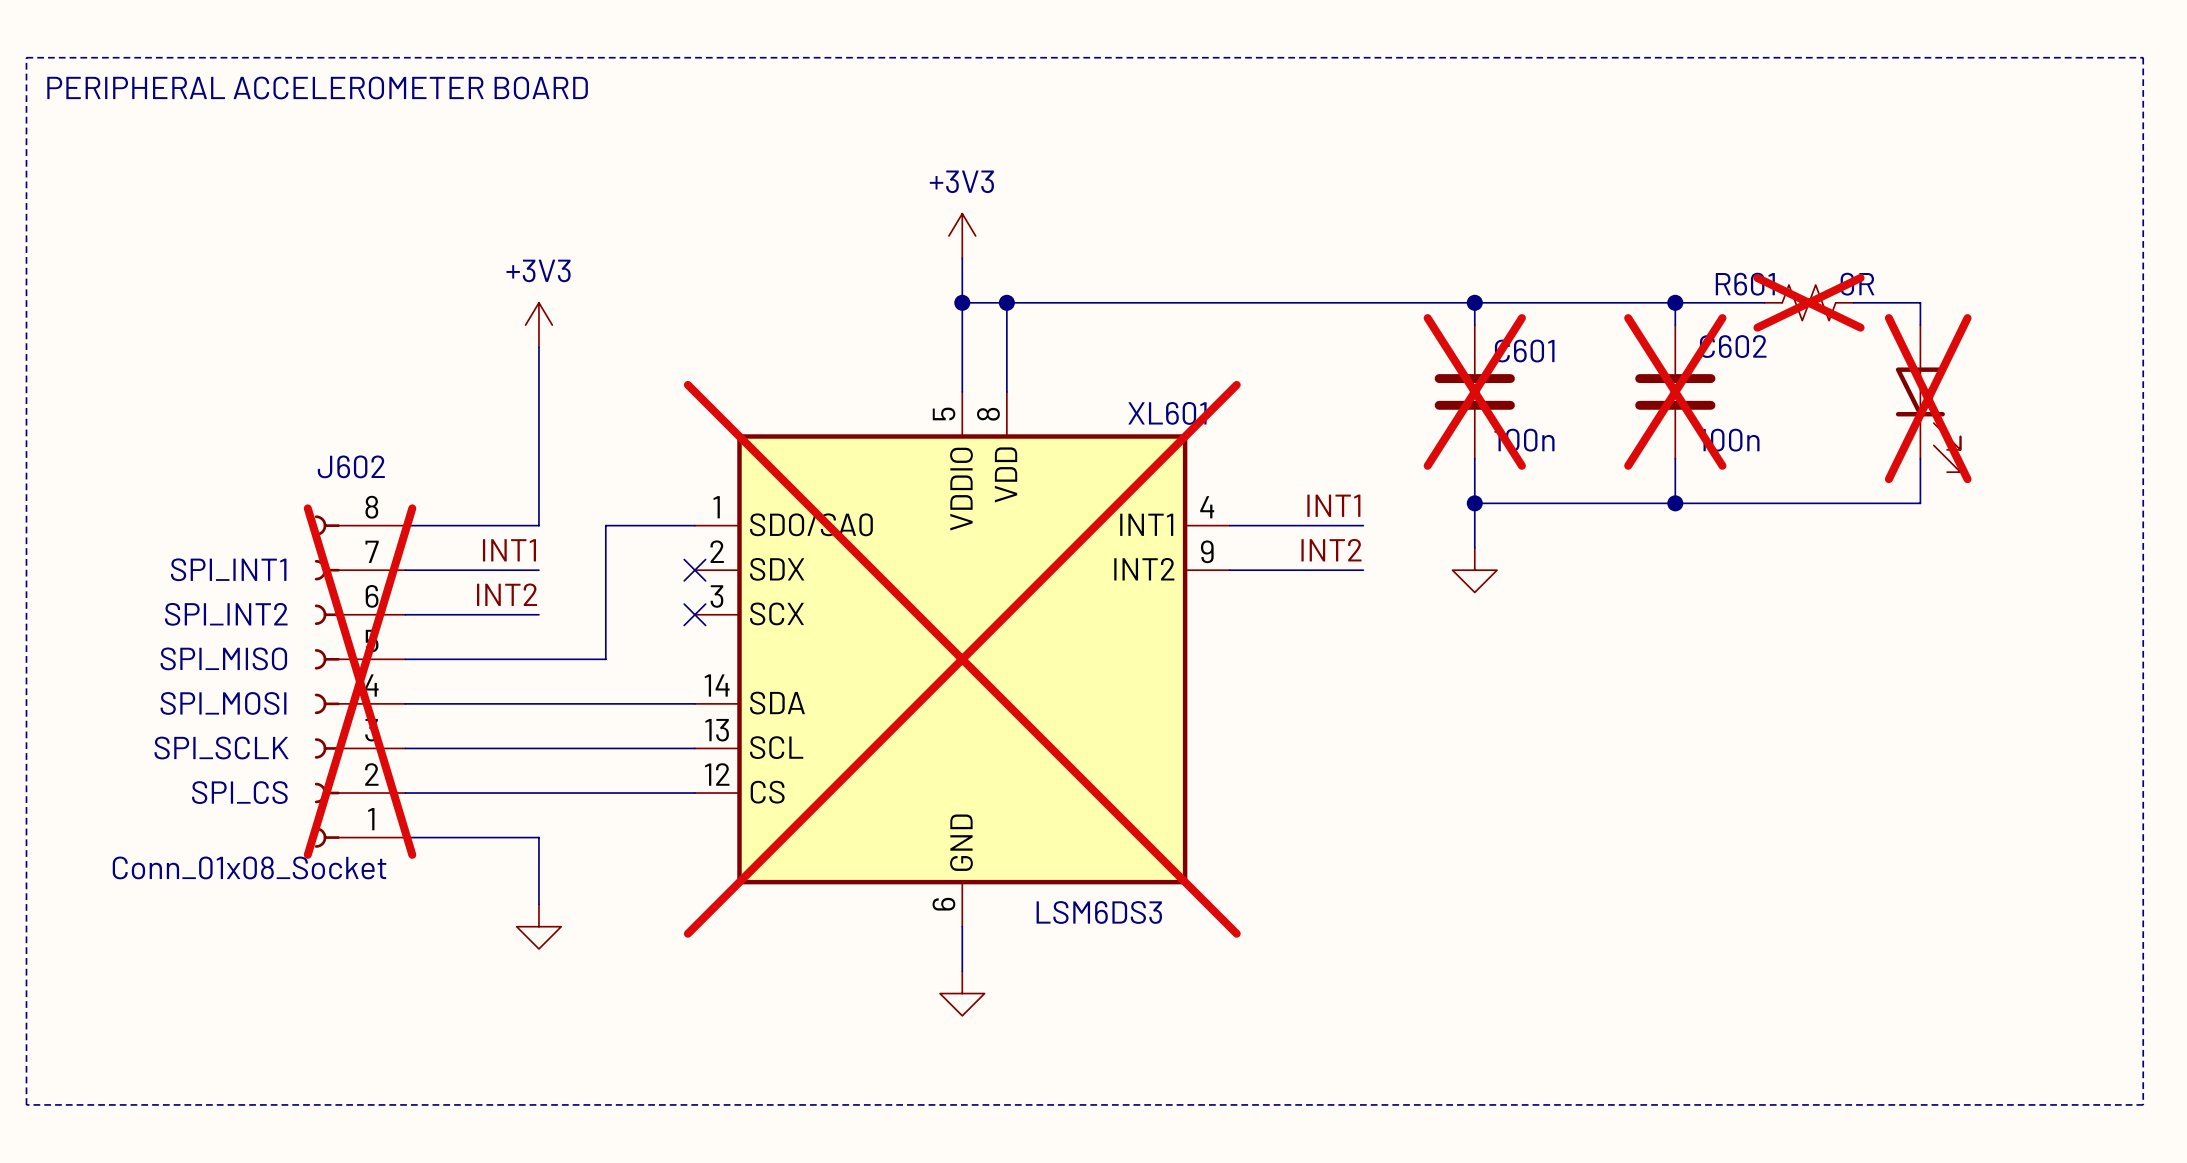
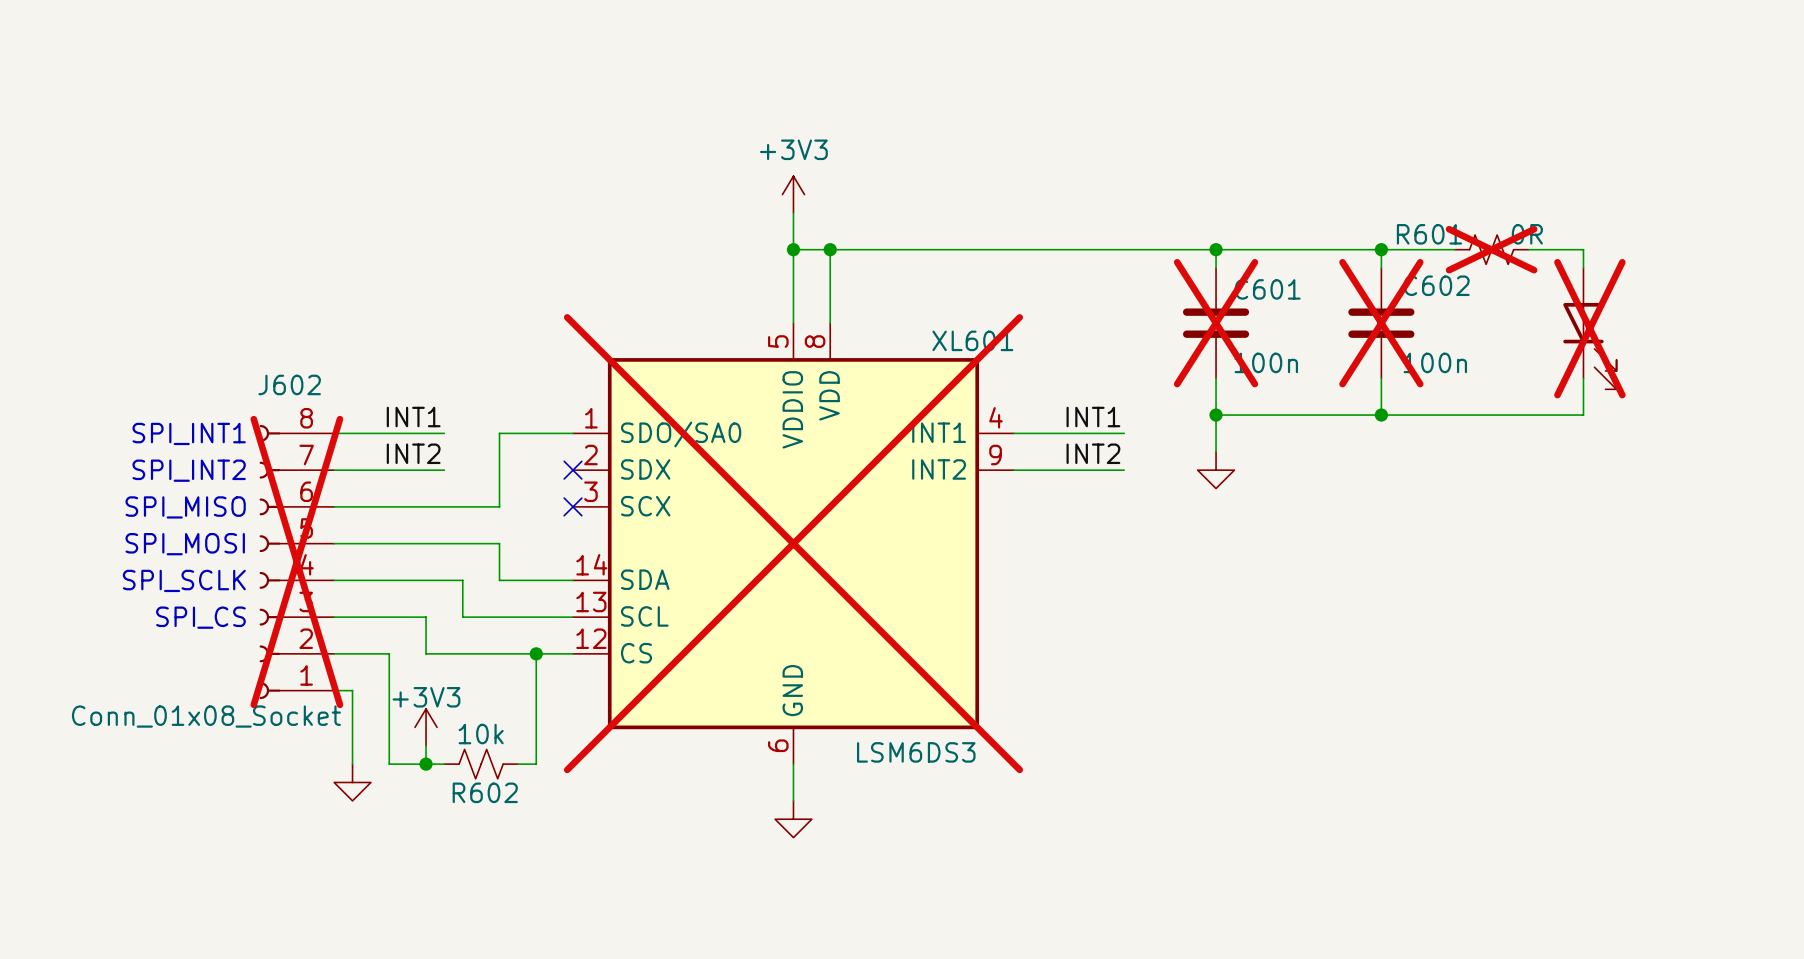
line: (26, 57) (2143, 57) (2143, 1104) (26, 1104) (26, 57) -> none
text: PERIPHERAL ACCELEROMETER BOARD (317, 87) -> none
power symbol: +3V3 (538, 325) -> none
wire: (538, 347) (538, 525) -> none
label: none -> INT1 (413, 417)
label: INT1 (509, 550) -> INT2 (413, 453)
text position: SPI_INT1 (228, 569) -> SPI_INT1 (189, 433)
label: INT2 (507, 594) -> none
text position: SPI_INT2 (226, 614) -> SPI_INT2 (189, 470)
wire: (605, 614) (605, 659) -> (499, 506) (444, 506)
text position: SPI_MISO (223, 658) -> SPI_MISO (185, 507)
text position: SPI_MOSI (223, 703) -> SPI_MOSI (185, 544)
wire: (561, 703) (605, 703) -> (499, 543) (499, 580)
text position: SPI_SCLK (221, 748) -> SPI_SCLK (184, 580)
wire: (516, 748) (561, 748) -> (462, 580) (462, 617)
text position: SPI_CS (239, 792) -> SPI_CS (200, 617)
wire: (472, 793) (516, 793) -> (426, 617) (426, 653)
wire: none -> (389, 653) (389, 764) (444, 764)
wire: none -> (536, 653) (536, 764) (517, 764)
junction: none -> (536, 653)
wire: (427, 837) (538, 837) (538, 904) -> (352, 690) (352, 764)
power symbol: none -> +3V3 (426, 727)
wire: none -> (426, 745) (426, 764)
junction: none -> (426, 764)
power symbol position: (538, 926) -> (352, 782)
R602: none -> 10k (481, 764)

